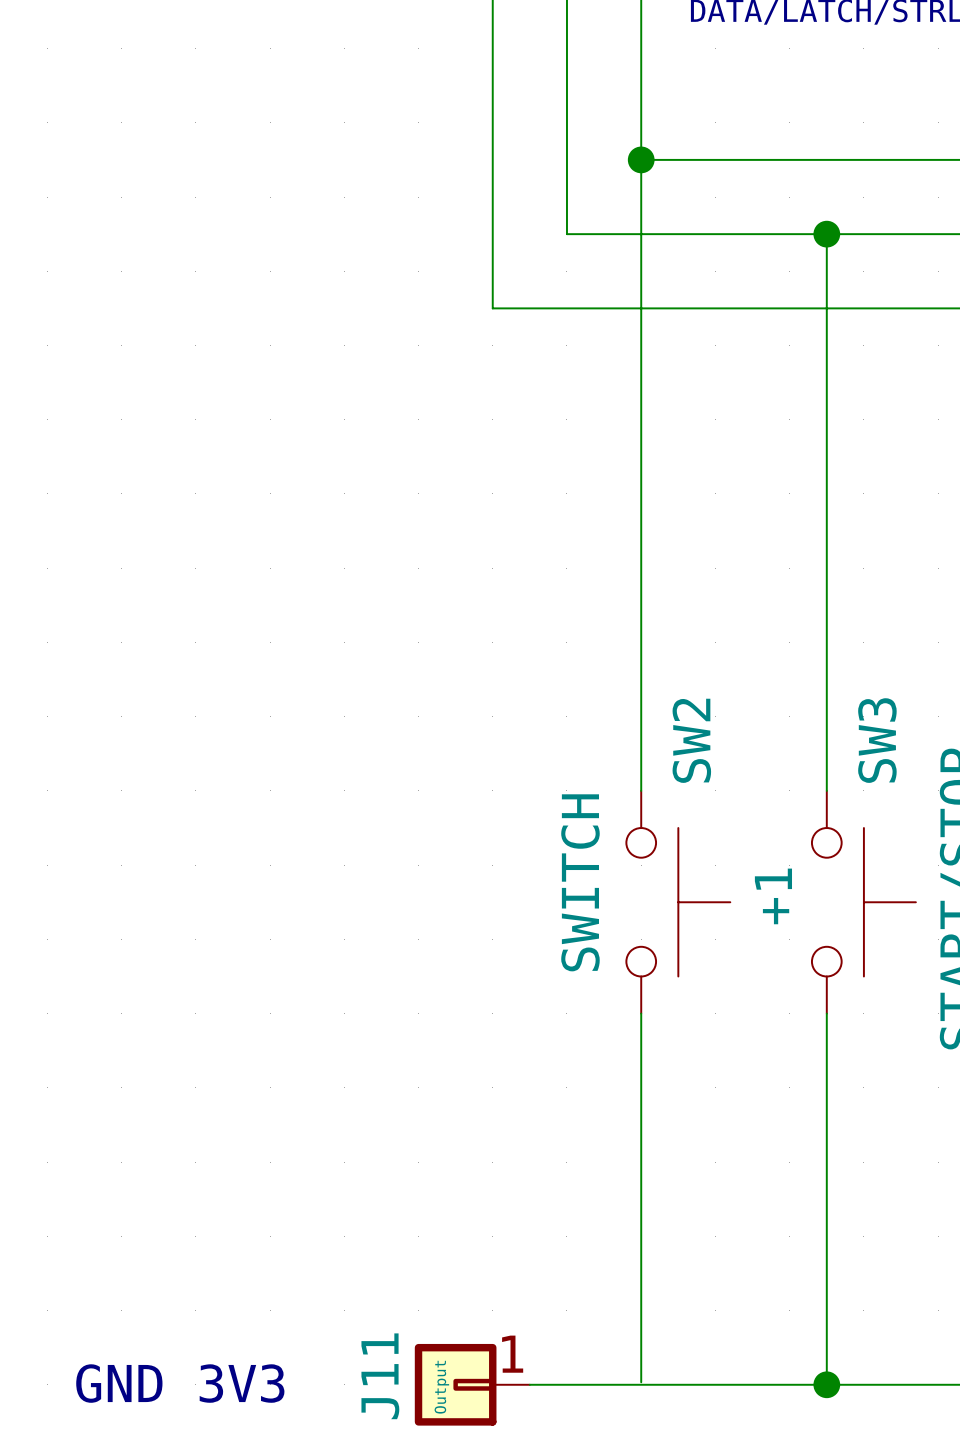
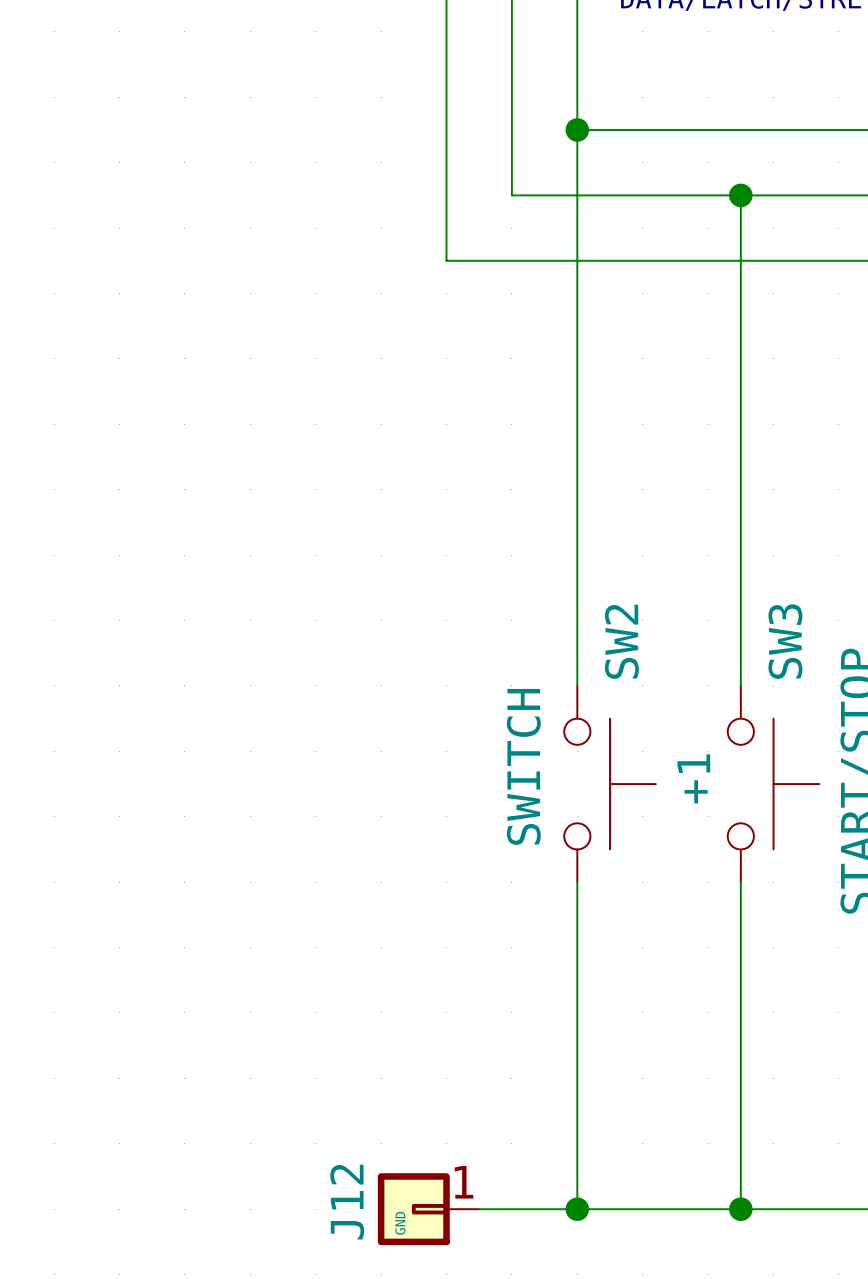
J11 name: J11 (380, 1376) -> J12 (347, 1202)
text: GND 3V3 (180, 1383) -> none
junction: none -> (577, 1209)
J11 value: Output (441, 1387) -> GND (400, 1223)

